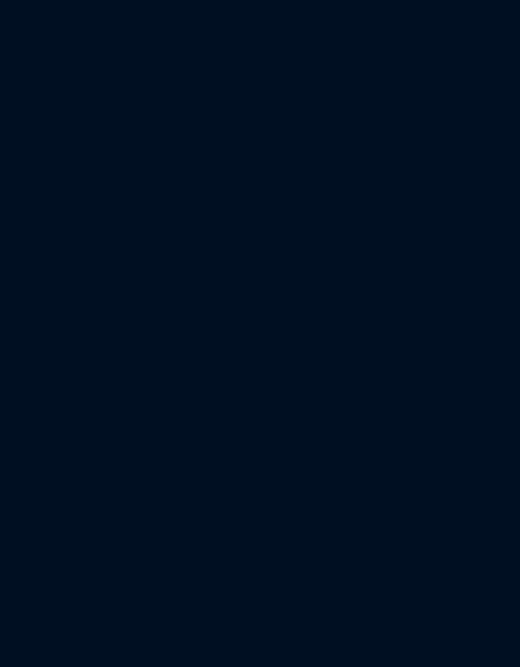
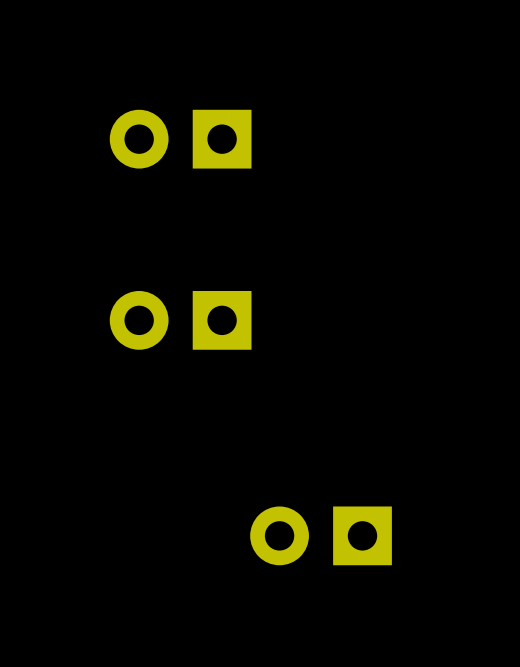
part: none -> (180, 139)
part: none -> (180, 320)
part: none -> (321, 535)

